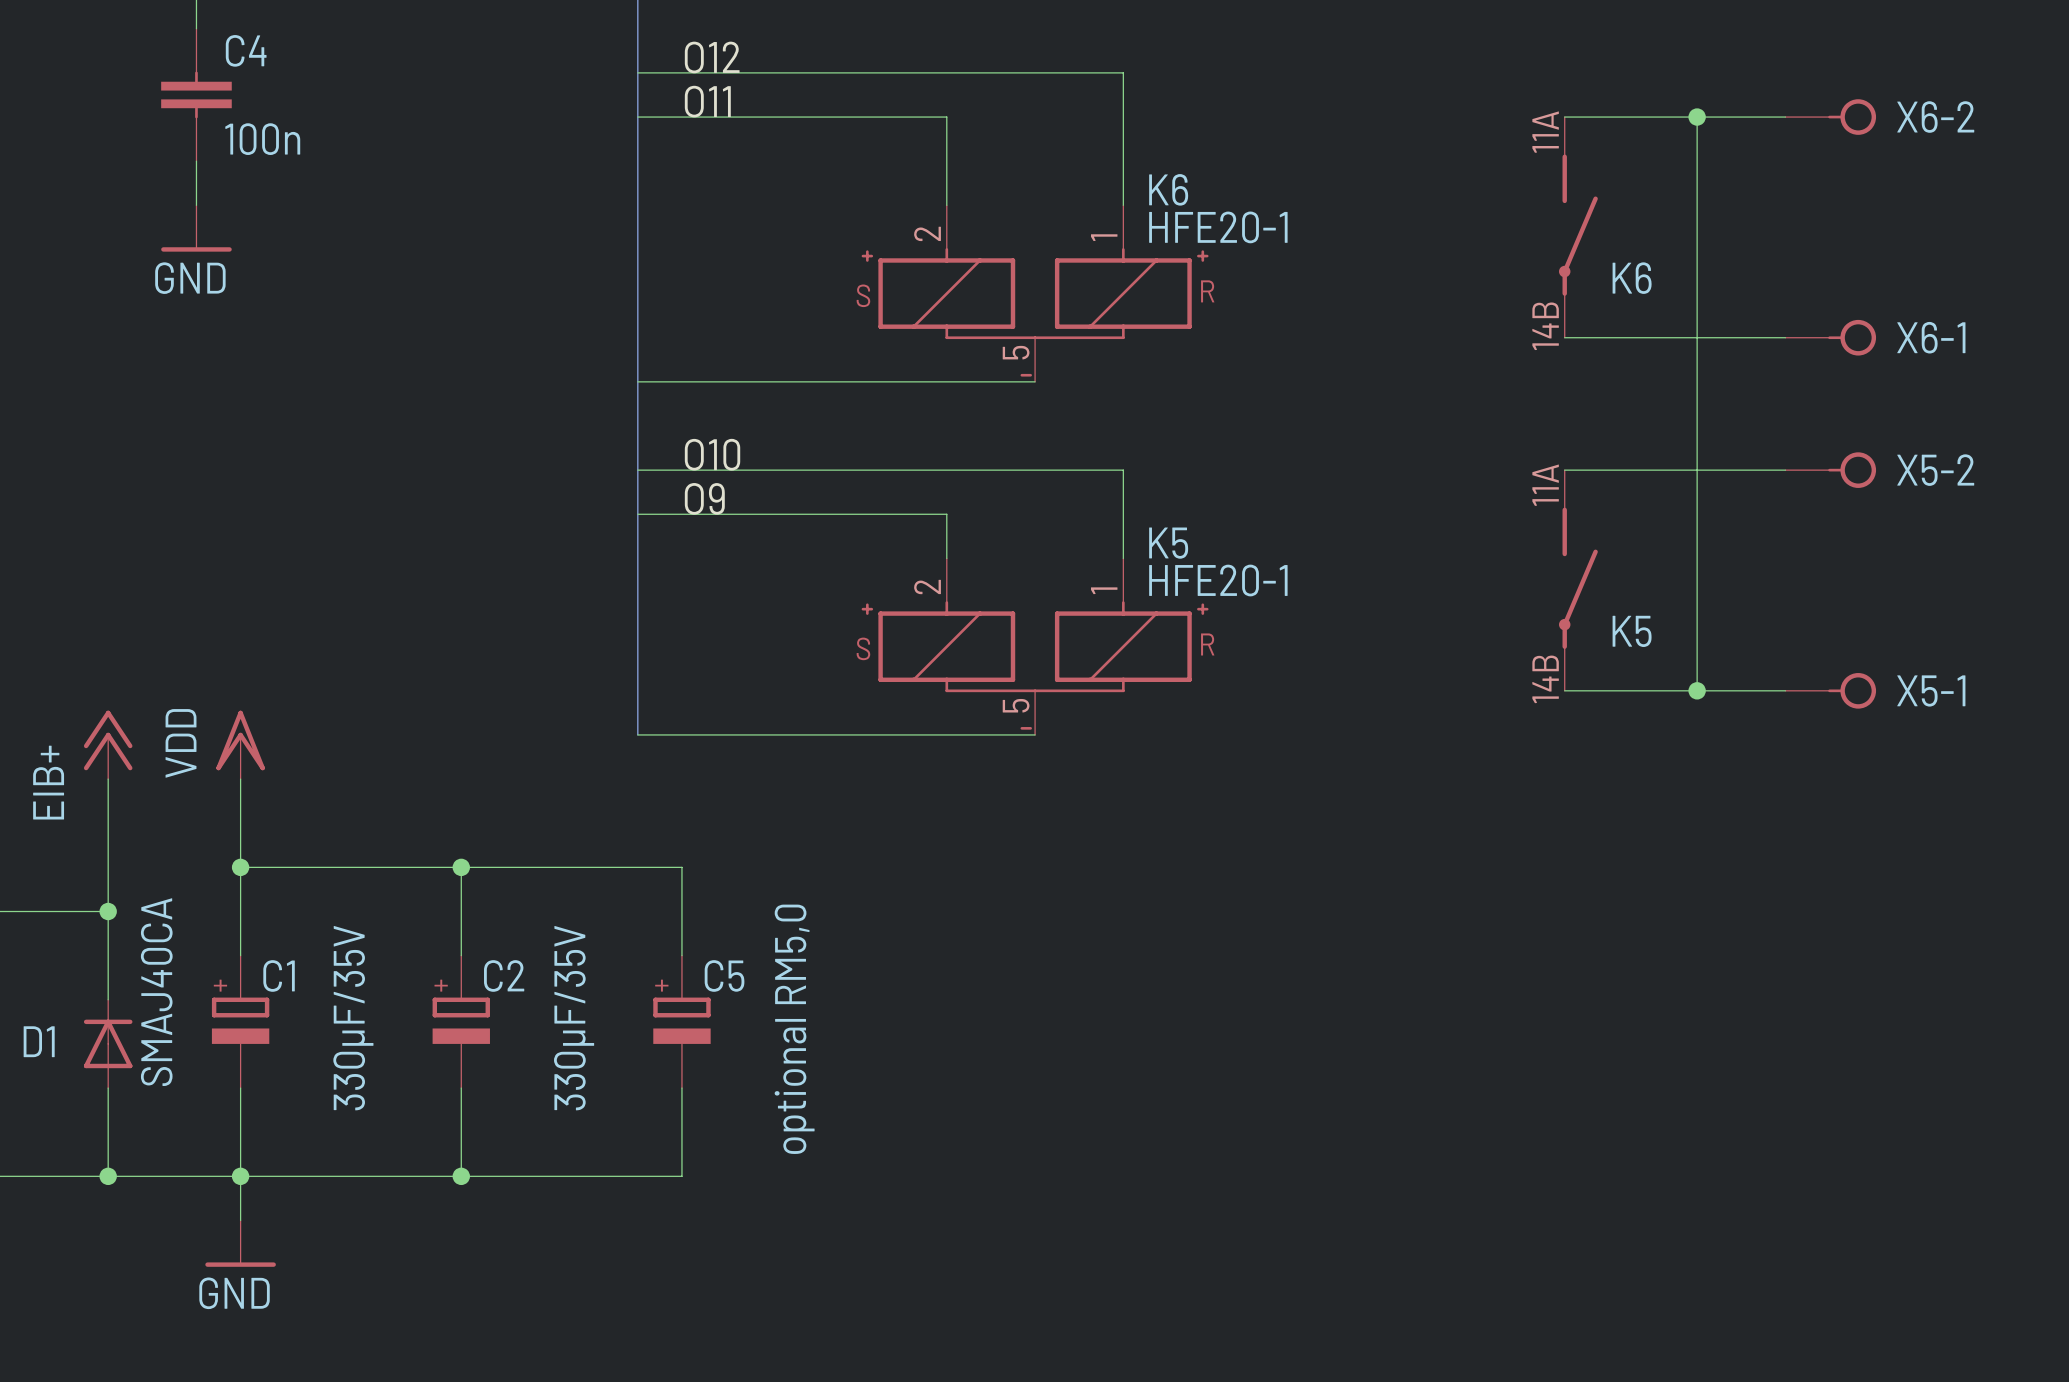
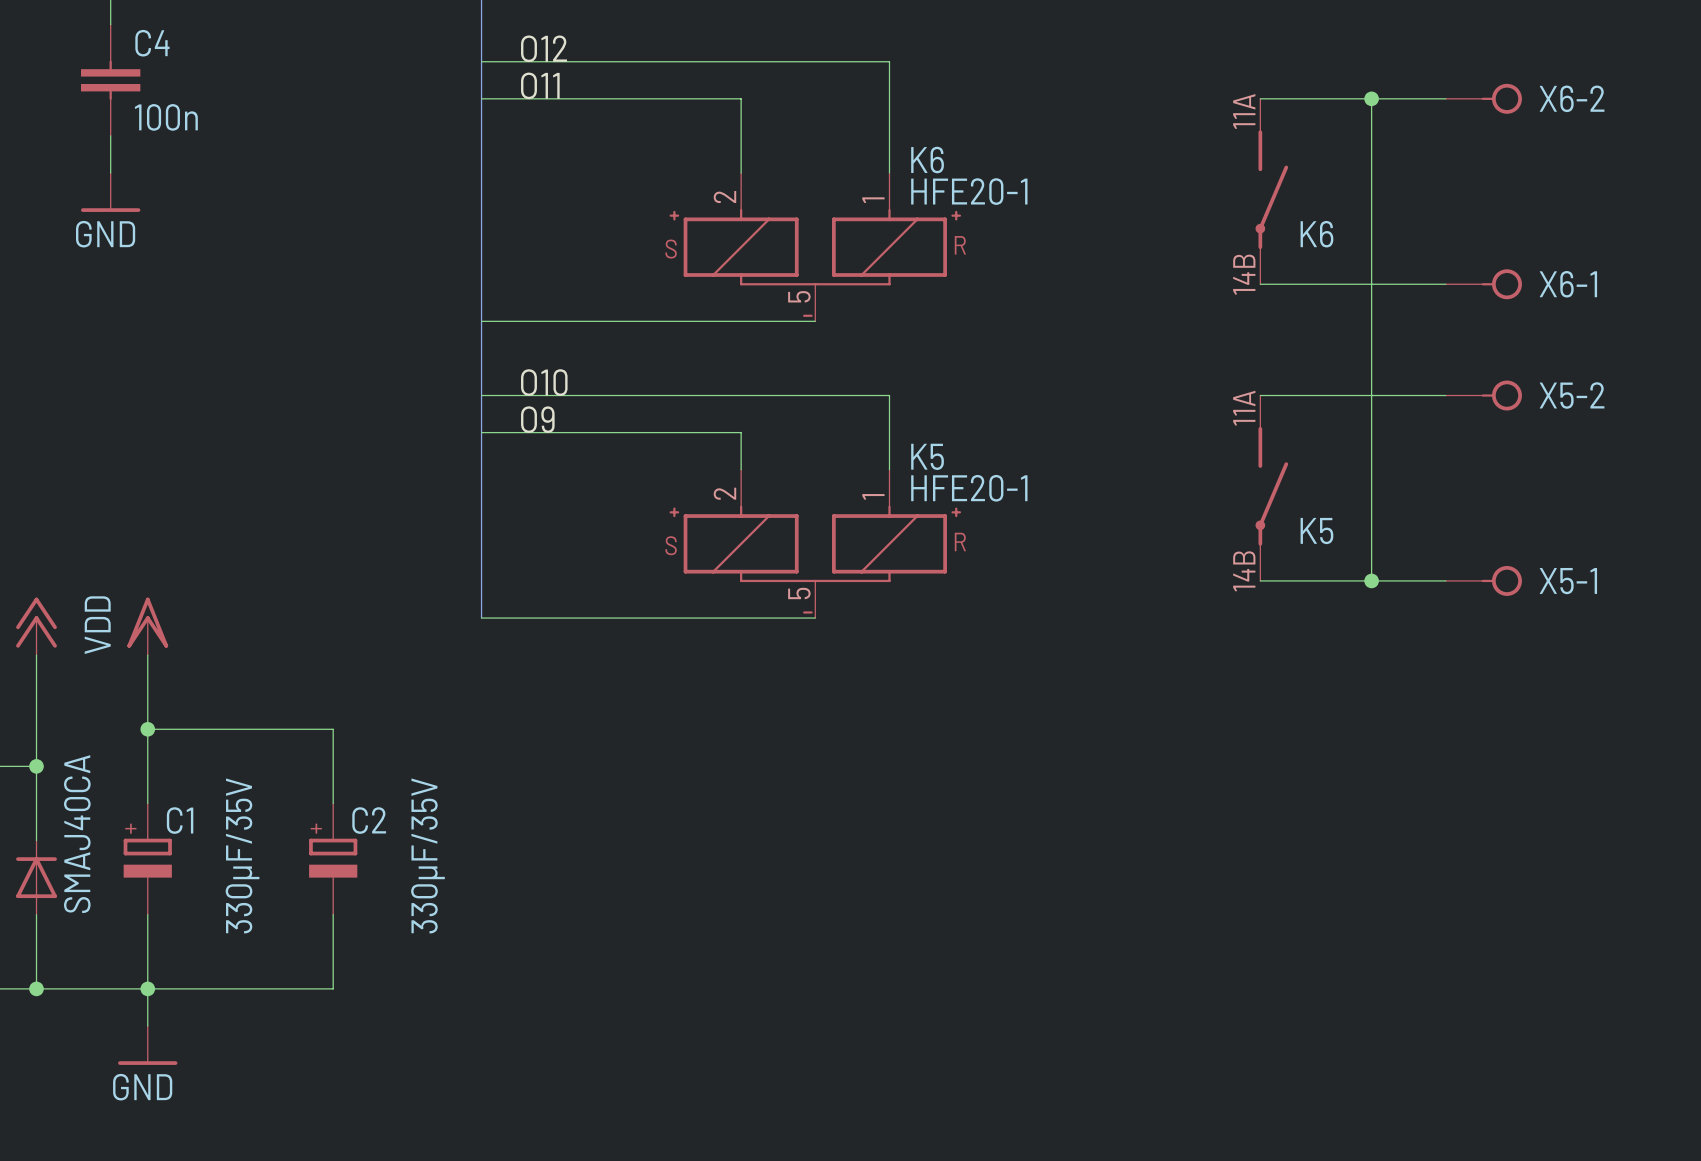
wire: (461, 867) (681, 867) (681, 955) -> none
junction: (461, 867) -> none
C5: optional RM5,0 (681, 1021) -> none
wire: (681, 1088) (681, 1176) (461, 1176) -> none
junction: (461, 1176) -> none

